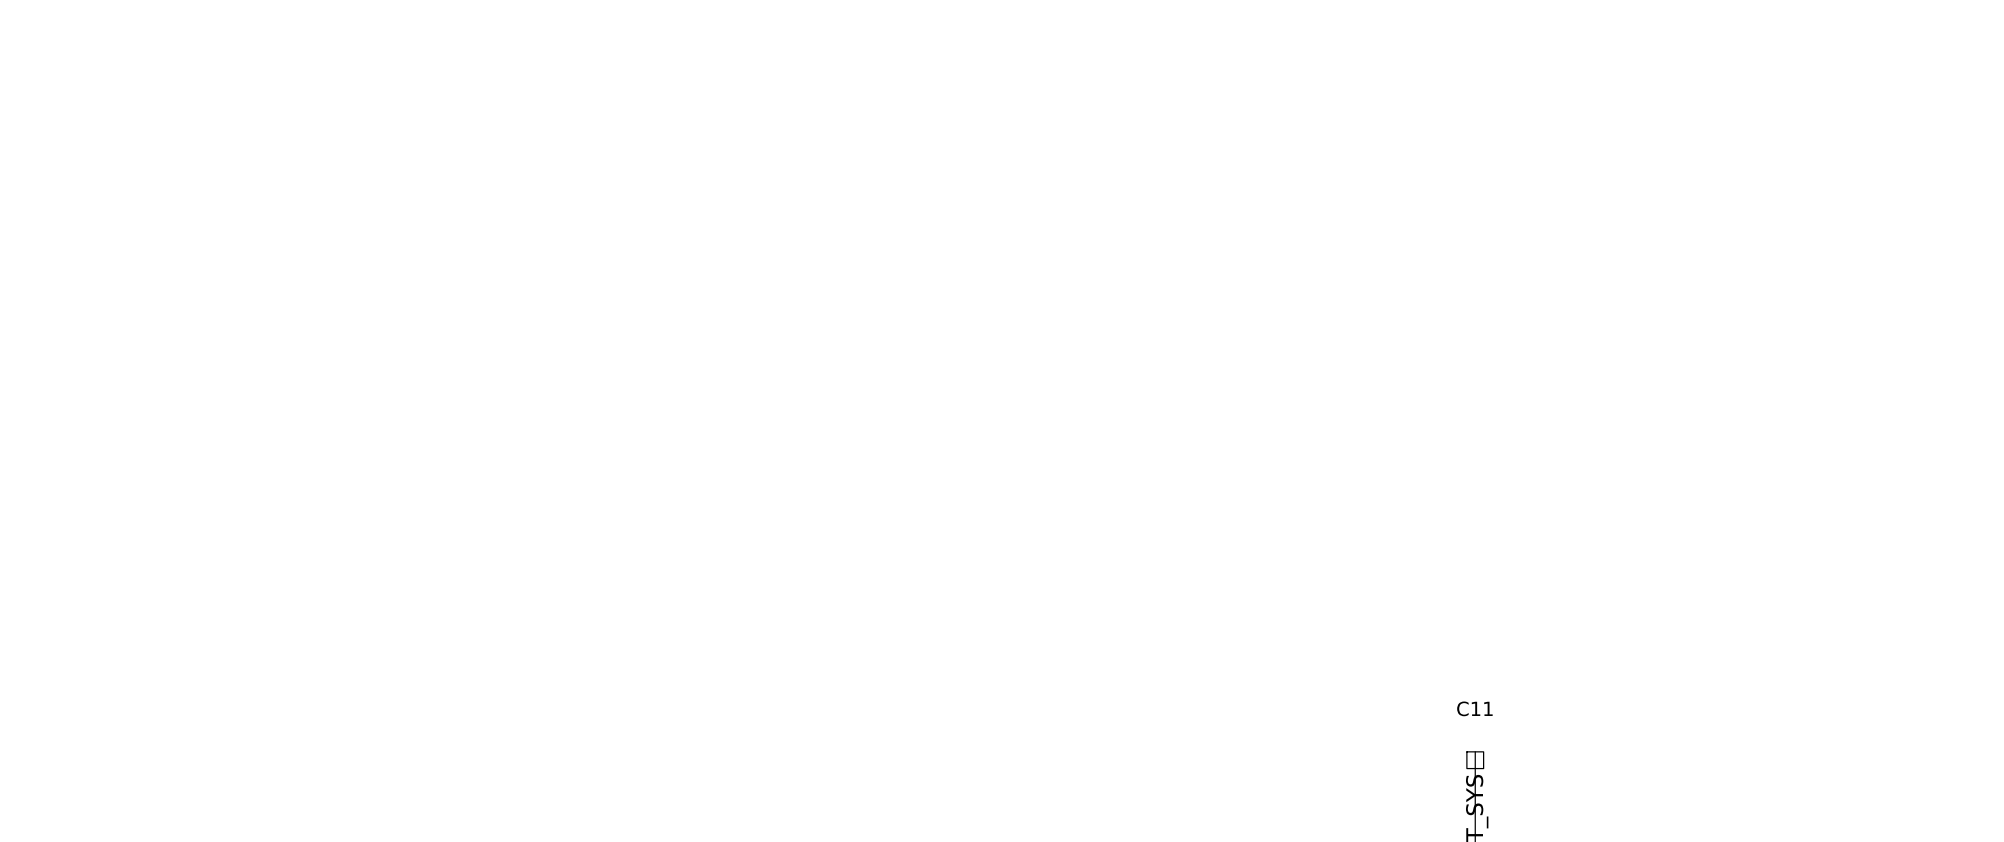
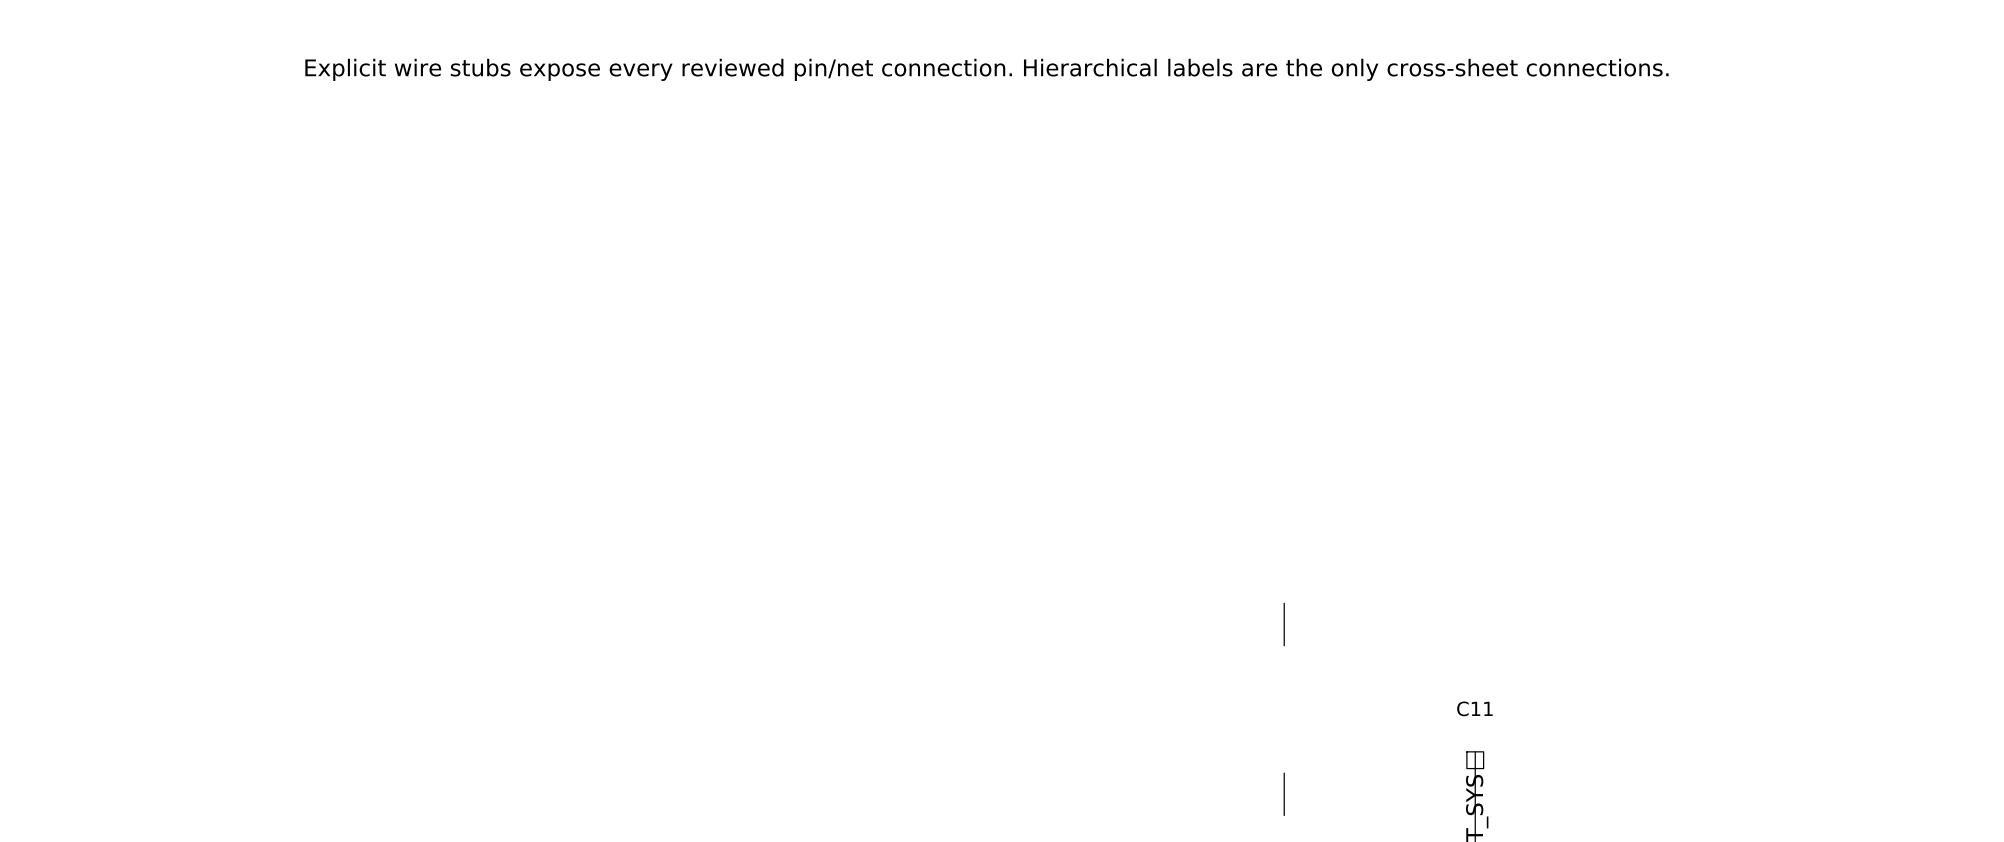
text: none -> Explicit wire stubs expose every reviewed pin/net connection. Hierarchical labels are the only cross-sheet connections. (986, 69)
wire: none -> (1284, 603) (1284, 645)
wire: none -> (1284, 773) (1284, 815)

